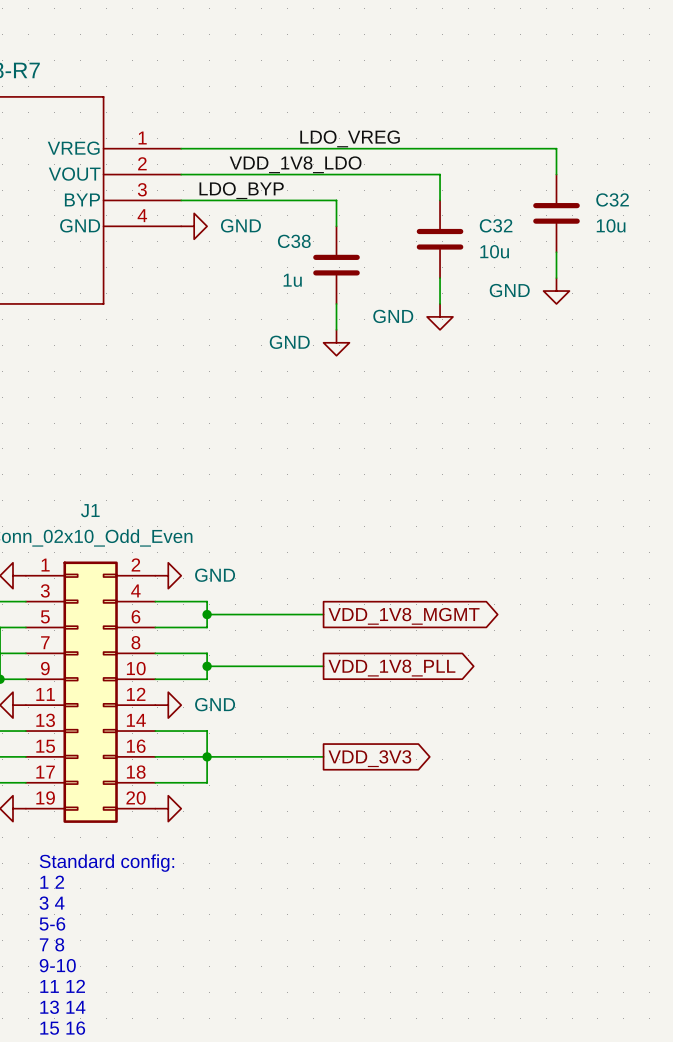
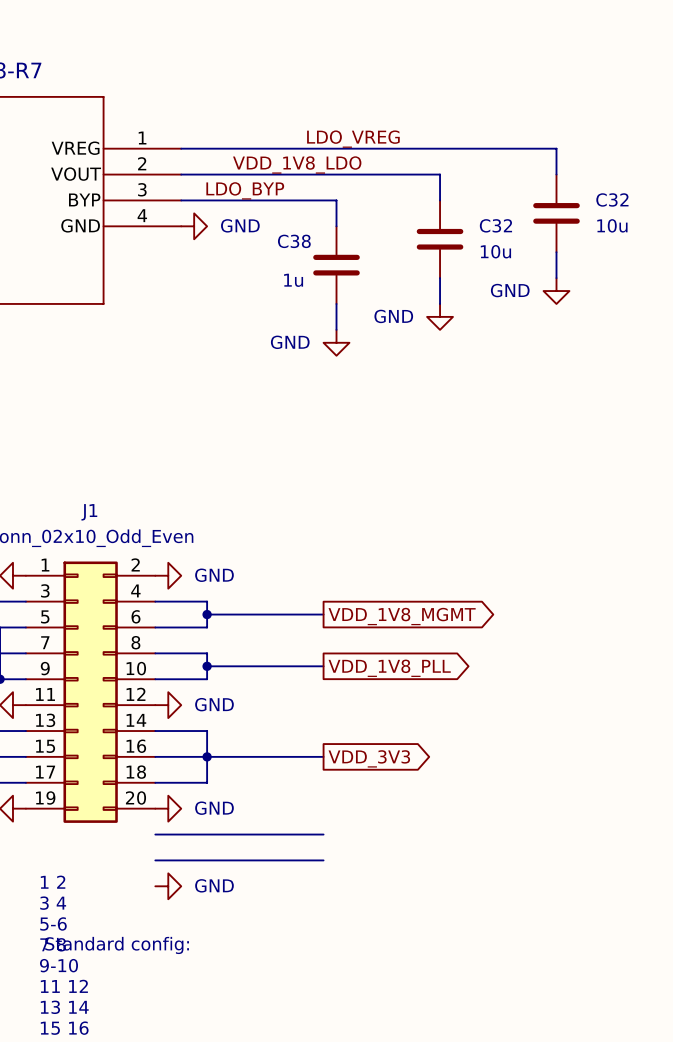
power symbol text: none -> GND (214, 808)
wire: none -> (155, 834) (323, 834)
wire: none -> (155, 860) (323, 860)
text position: Standard config: (106, 863) -> Standard config: (117, 945)
power symbol: none -> GND (168, 886)

